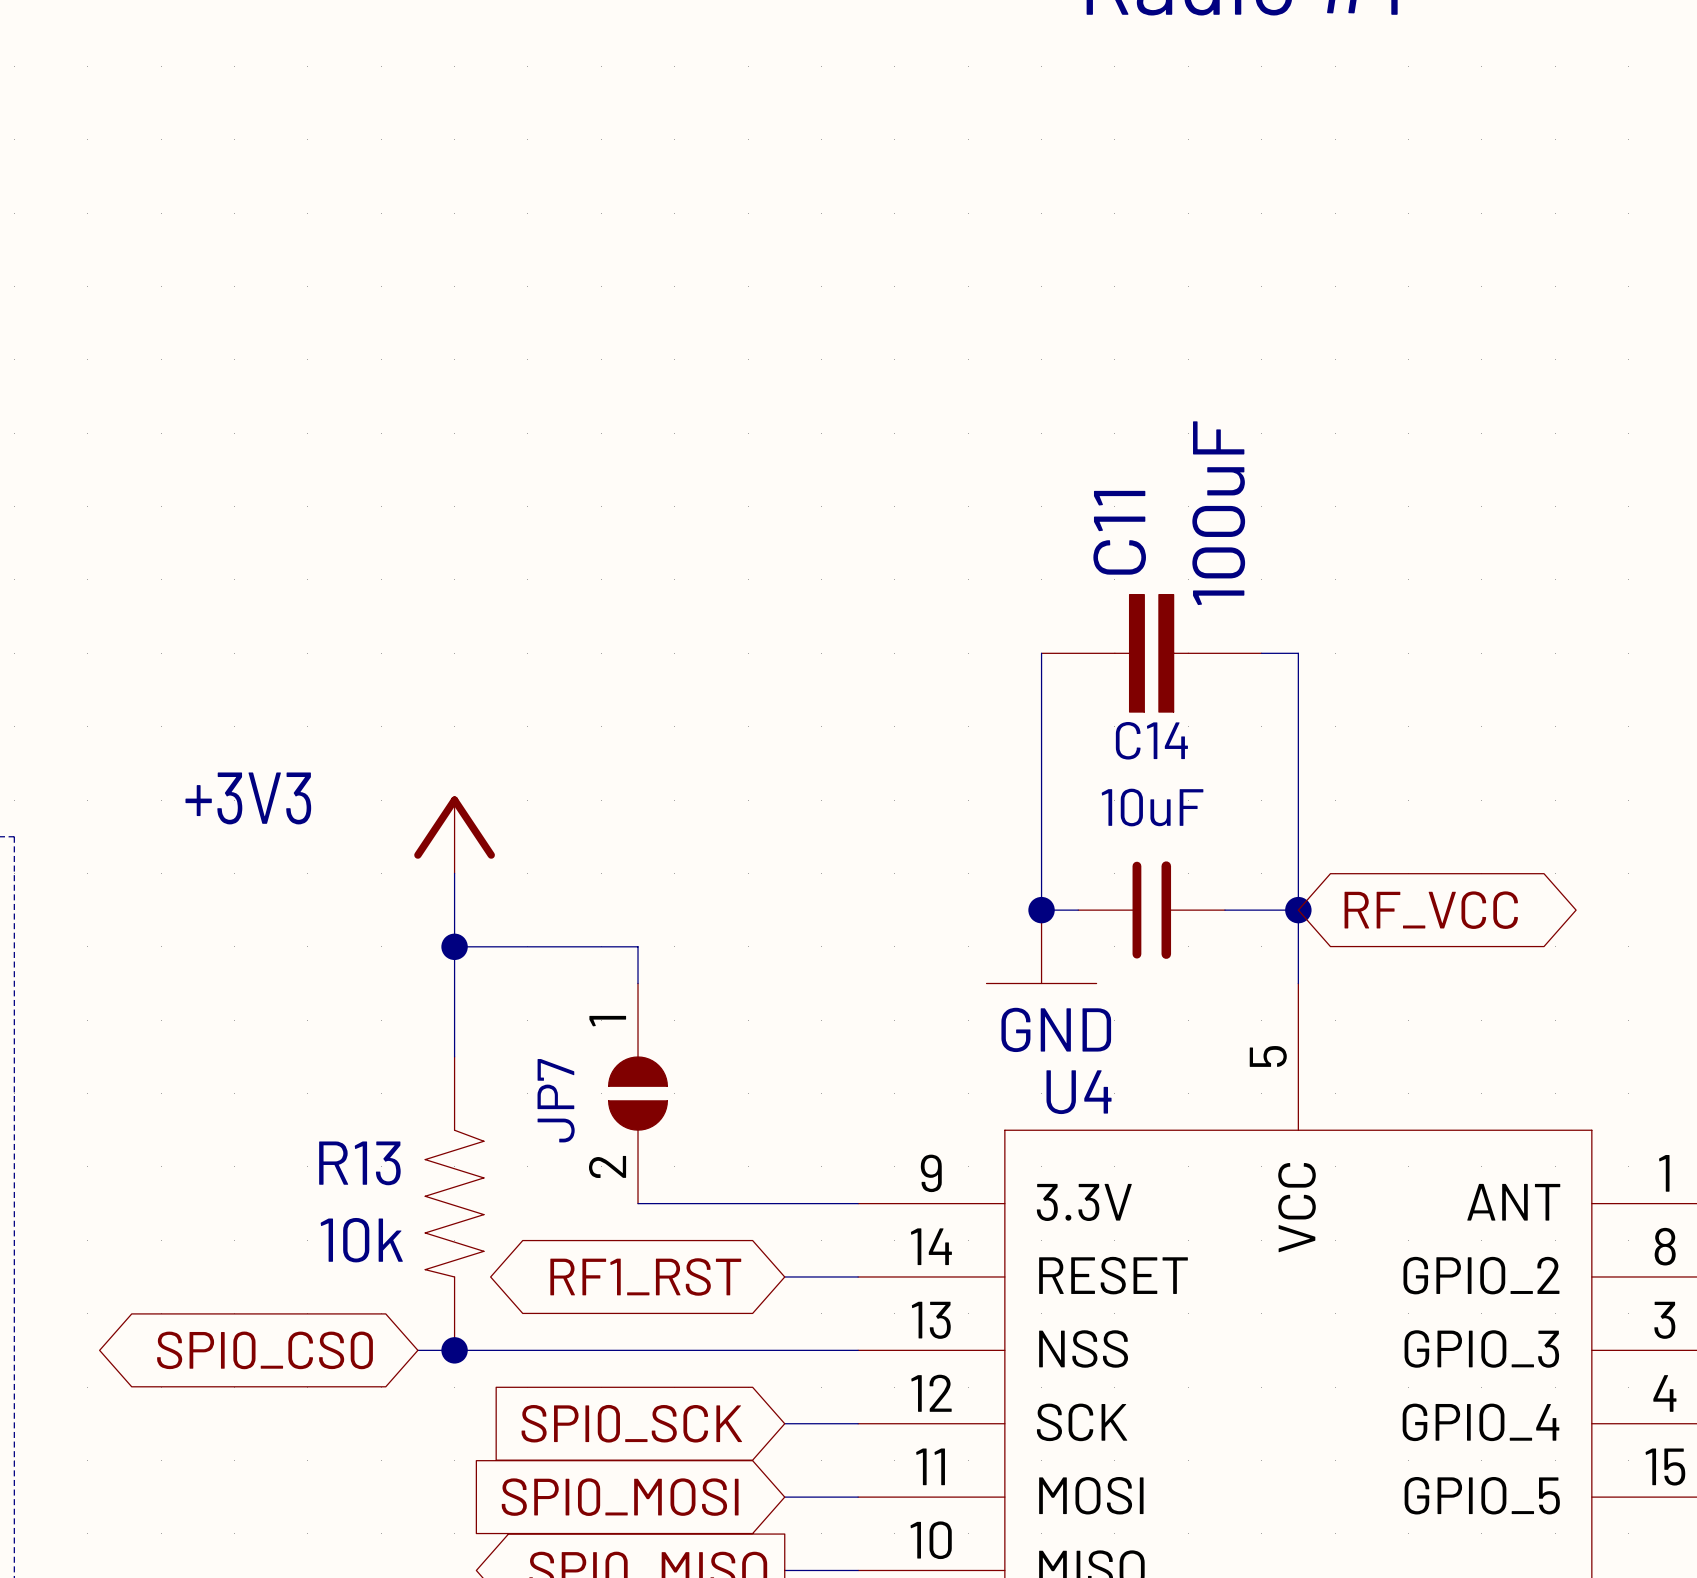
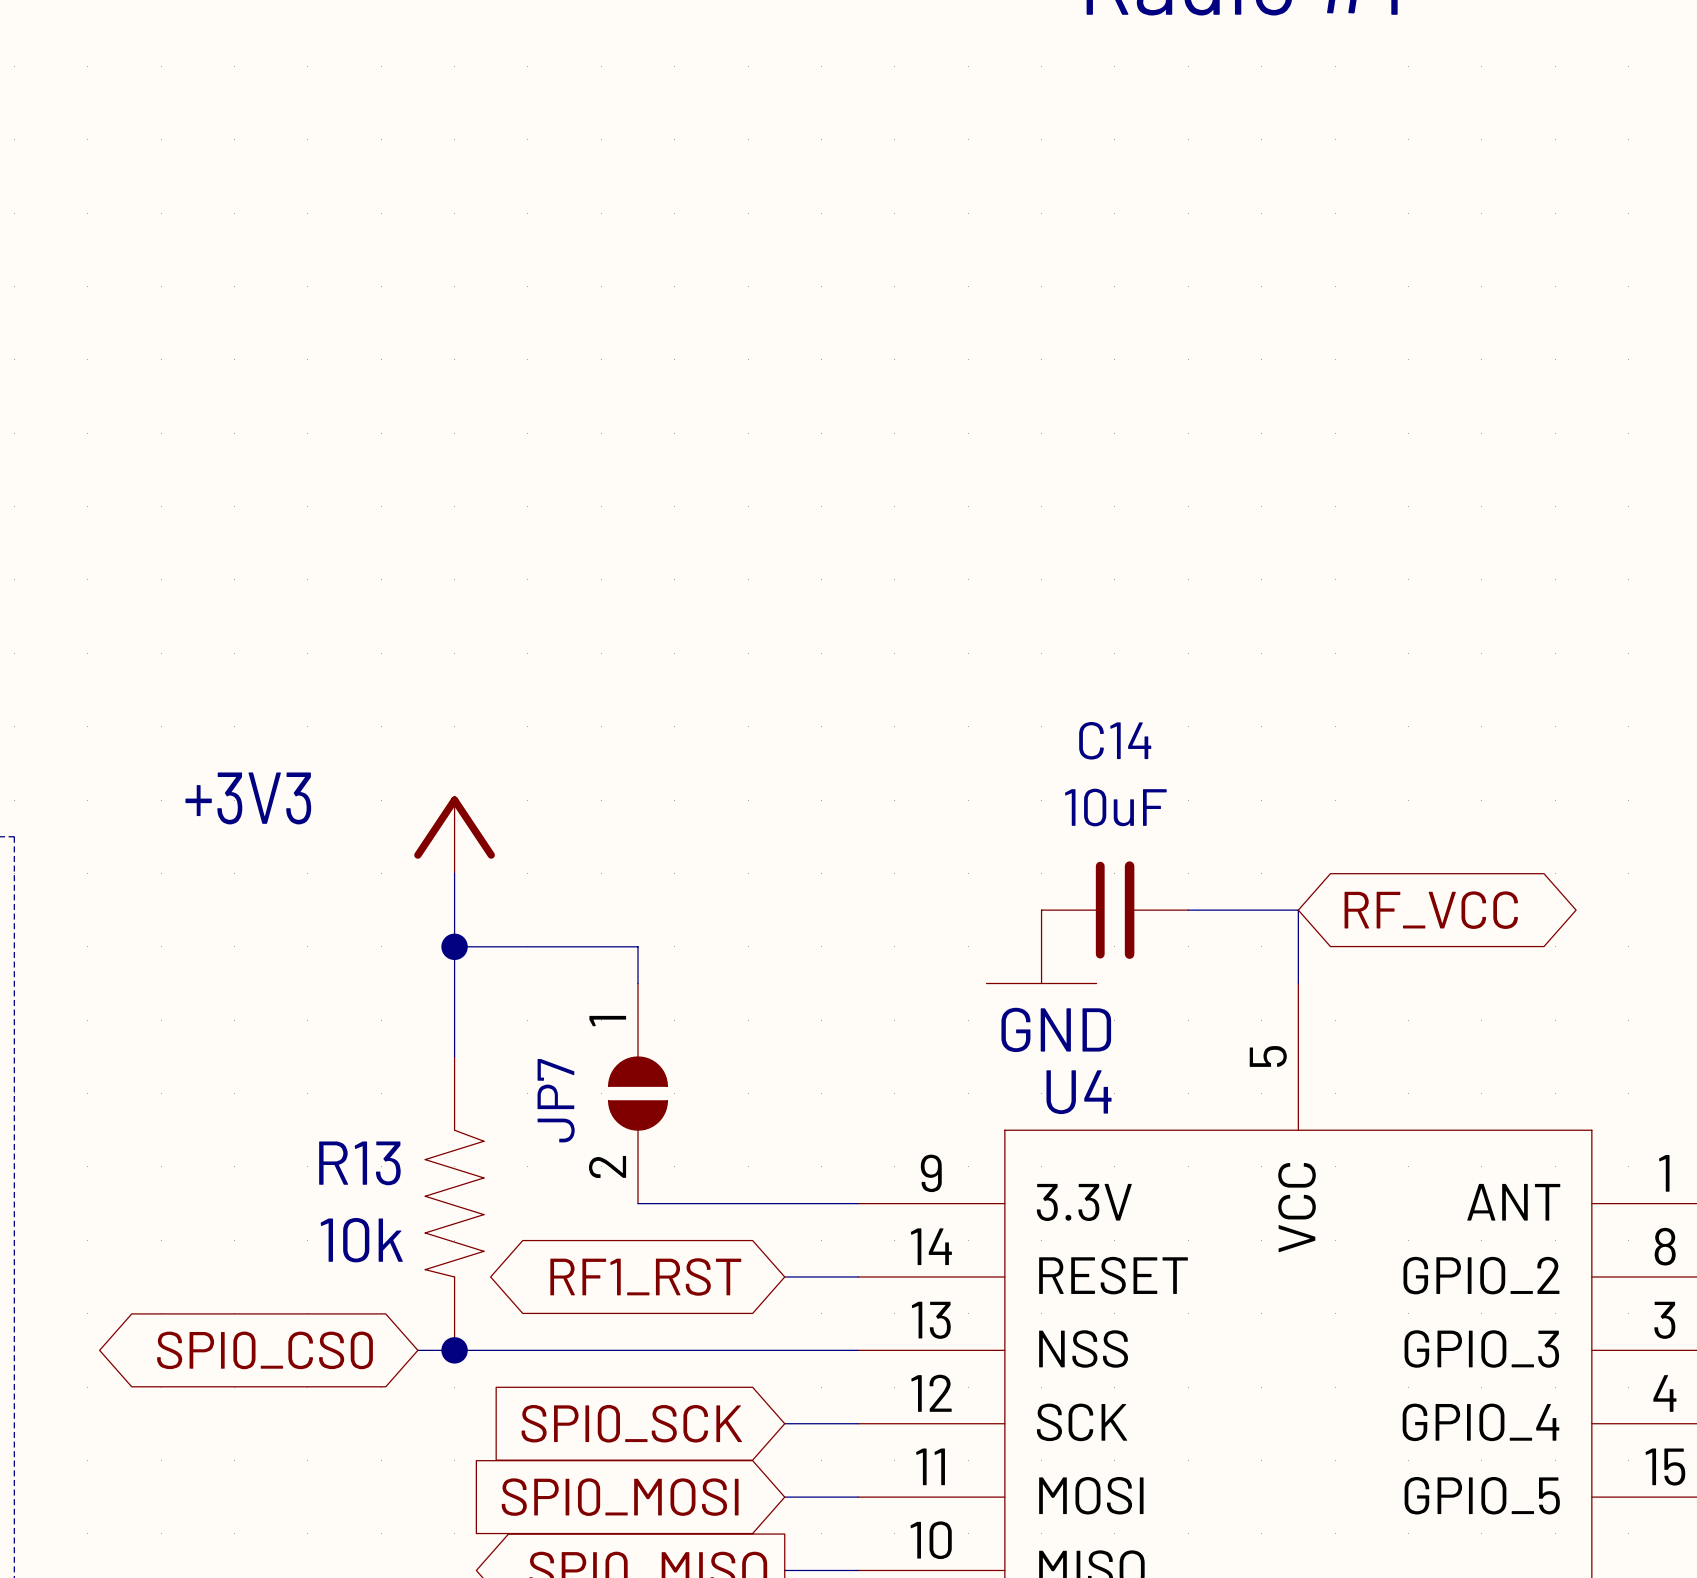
wire: (1041, 653) (1041, 910) (1078, 910) -> none
C11: 100uF (1151, 653) -> none
wire: (1261, 653) (1298, 653) (1298, 910) -> none
junction: (1041, 910) -> none
C14 position: (1151, 910) -> (1114, 910)
junction: (1298, 910) -> none

